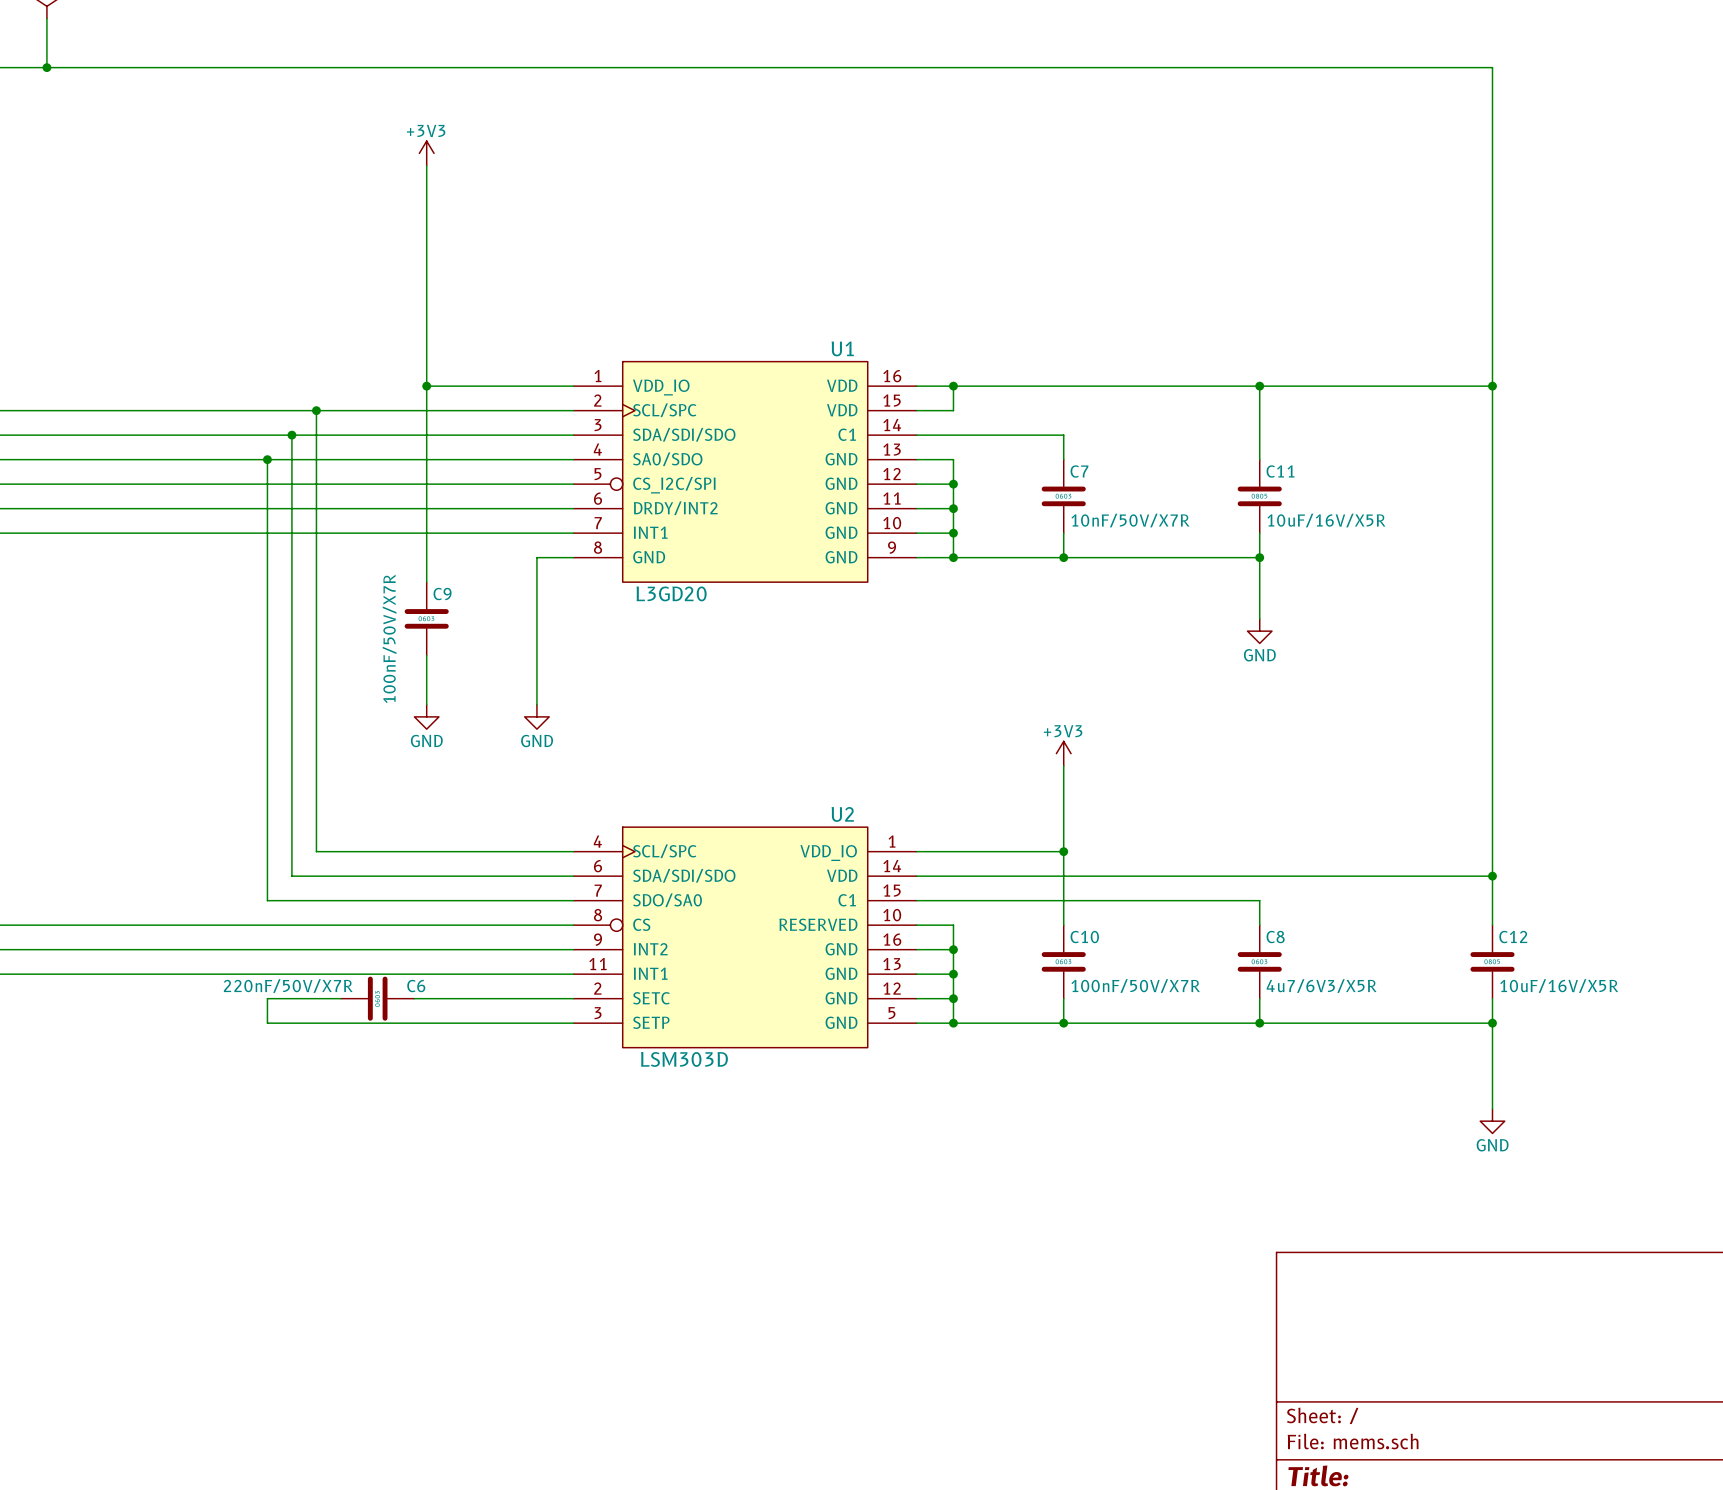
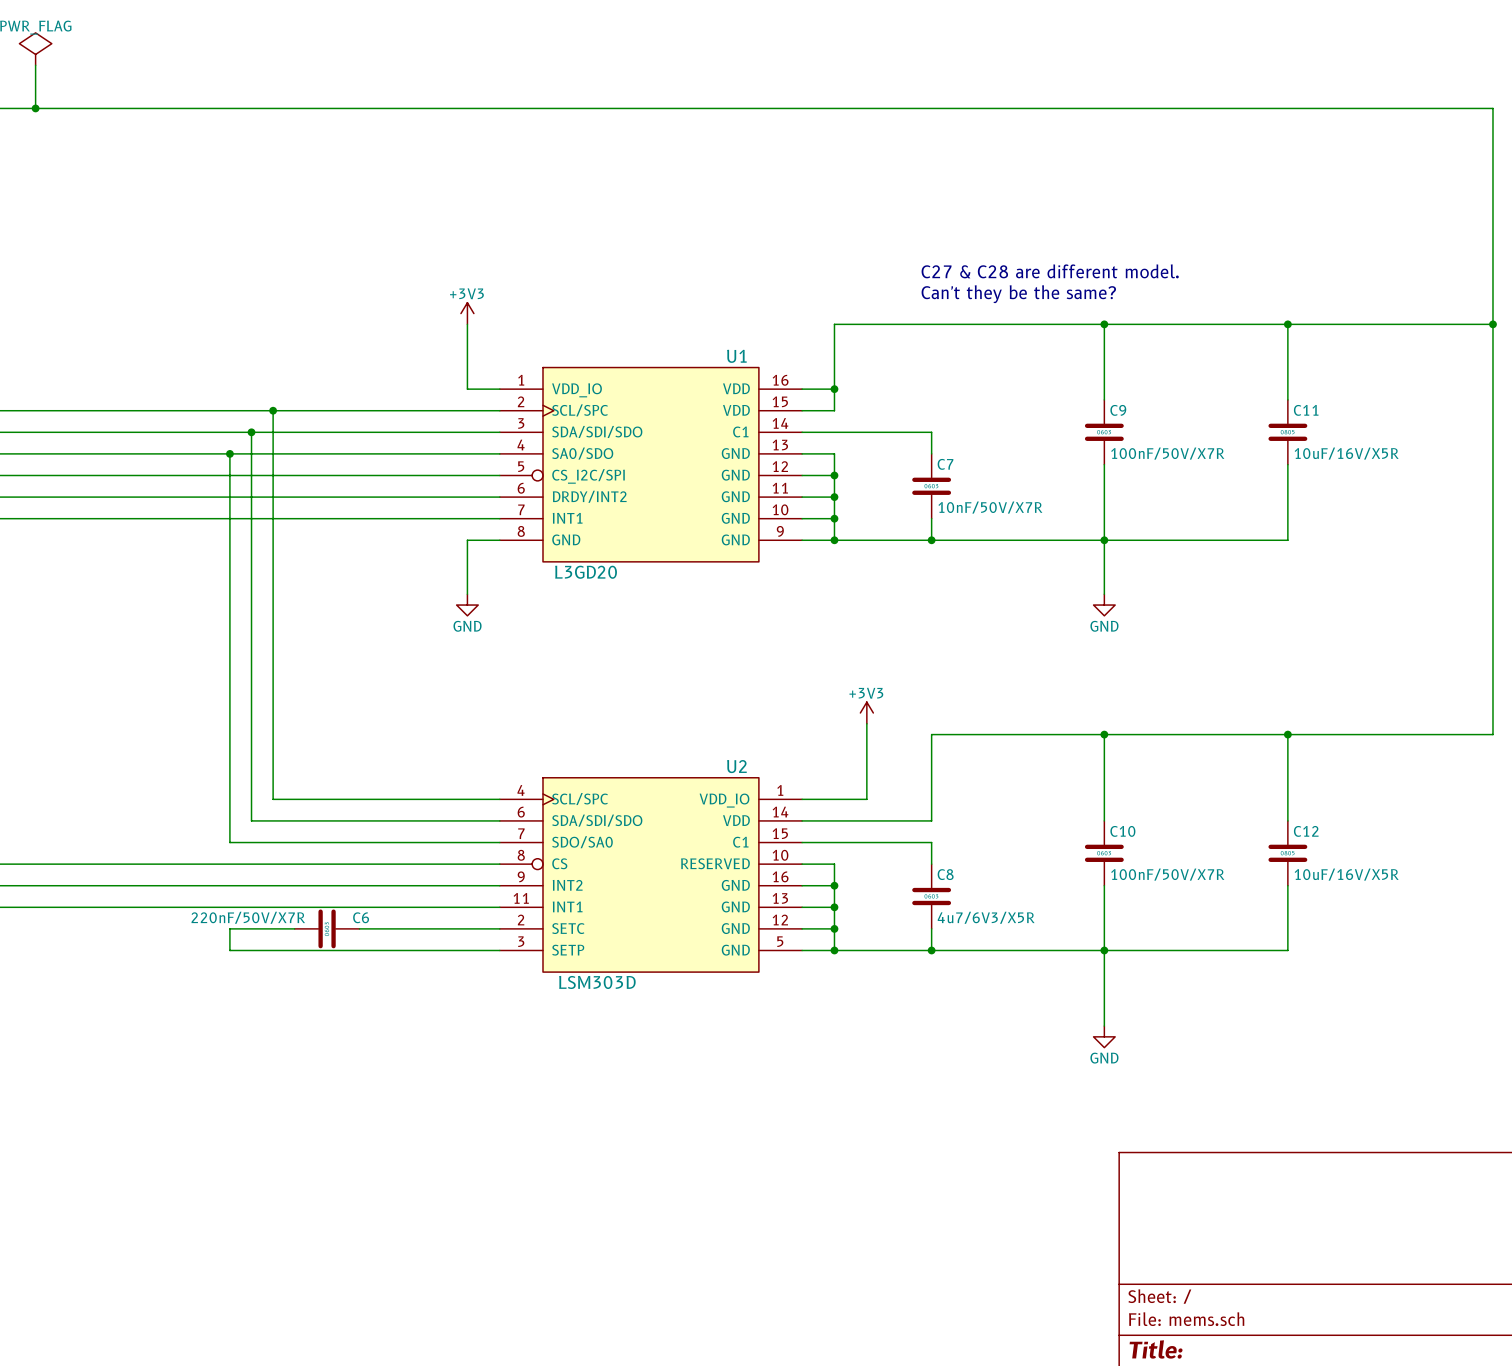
wire: (1492, 67) (1492, 925) -> (1309, 108) (1492, 108) (1492, 734) (931, 734)
power symbol position: +3V3 (426, 153) -> +3V3 (467, 313)
wire: (426, 165) (426, 582) -> none
text: none -> C27 & C28 are different model. (1050, 271)
text: none -> Can't they be the same? (1018, 294)
wire: none -> (1104, 324) (1104, 389)
junction: none -> (1104, 324)
wire: none -> (1287, 324) (1287, 399)
junction: none -> (1287, 324)
junction: none -> (1492, 324)
wire: (426, 386) (536, 386) -> (467, 324) (467, 389)
junction: (426, 386) -> none
wire: (953, 386) (1492, 386) -> (834, 389) (834, 324) (1492, 324)
junction: (1259, 386) -> none
junction: (1492, 386) -> none
wire: none -> (1287, 464) (1287, 540) (1104, 540)
C11 position: (1259, 496) -> (1287, 432)
C9 position: (426, 618) -> (1104, 432)
wire: (536, 618) (536, 704) -> none
power symbol: none -> GND (467, 605)
C9 value rotation: 0° (389, 638) -> 90° clockwise (1167, 453)
wire: (426, 655) (426, 704) -> none
power symbol: GND (426, 716) -> none
power symbol: GND (536, 716) -> none
power symbol position: +3V3 (1063, 753) -> +3V3 (866, 712)
wire: (1063, 765) (1063, 778) -> none
wire: none -> (1104, 734) (1104, 820)
junction: none -> (1104, 734)
wire: none -> (1287, 734) (1287, 820)
junction: none -> (1287, 734)
wire: (990, 851) (1063, 851) -> (866, 799) (866, 723)
junction: (1063, 851) -> none
wire: (1492, 876) (1063, 876) (1063, 900) (1259, 900) (1259, 925) -> none
junction: (1492, 876) -> none
C10: none -> 100nF/50V/X7R (1104, 853)
C10 name: C10 (1084, 937) -> C8 (945, 874)
C8: 4u7/6V3/X5R (1259, 961) -> none
C12 position: (1492, 961) -> (1287, 853)
C10 value: 100nF/50V/X7R (1135, 986) -> 4u7/6V3/X5R (986, 917)
wire: (1492, 998) (1492, 1108) -> none
wire: none -> (1104, 950) (1104, 1026)
wire: (1467, 1023) (1492, 1023) -> (1287, 950) (1287, 885)
junction: (1492, 1023) -> none
power symbol position: GND (1492, 1121) -> GND (1104, 1036)

